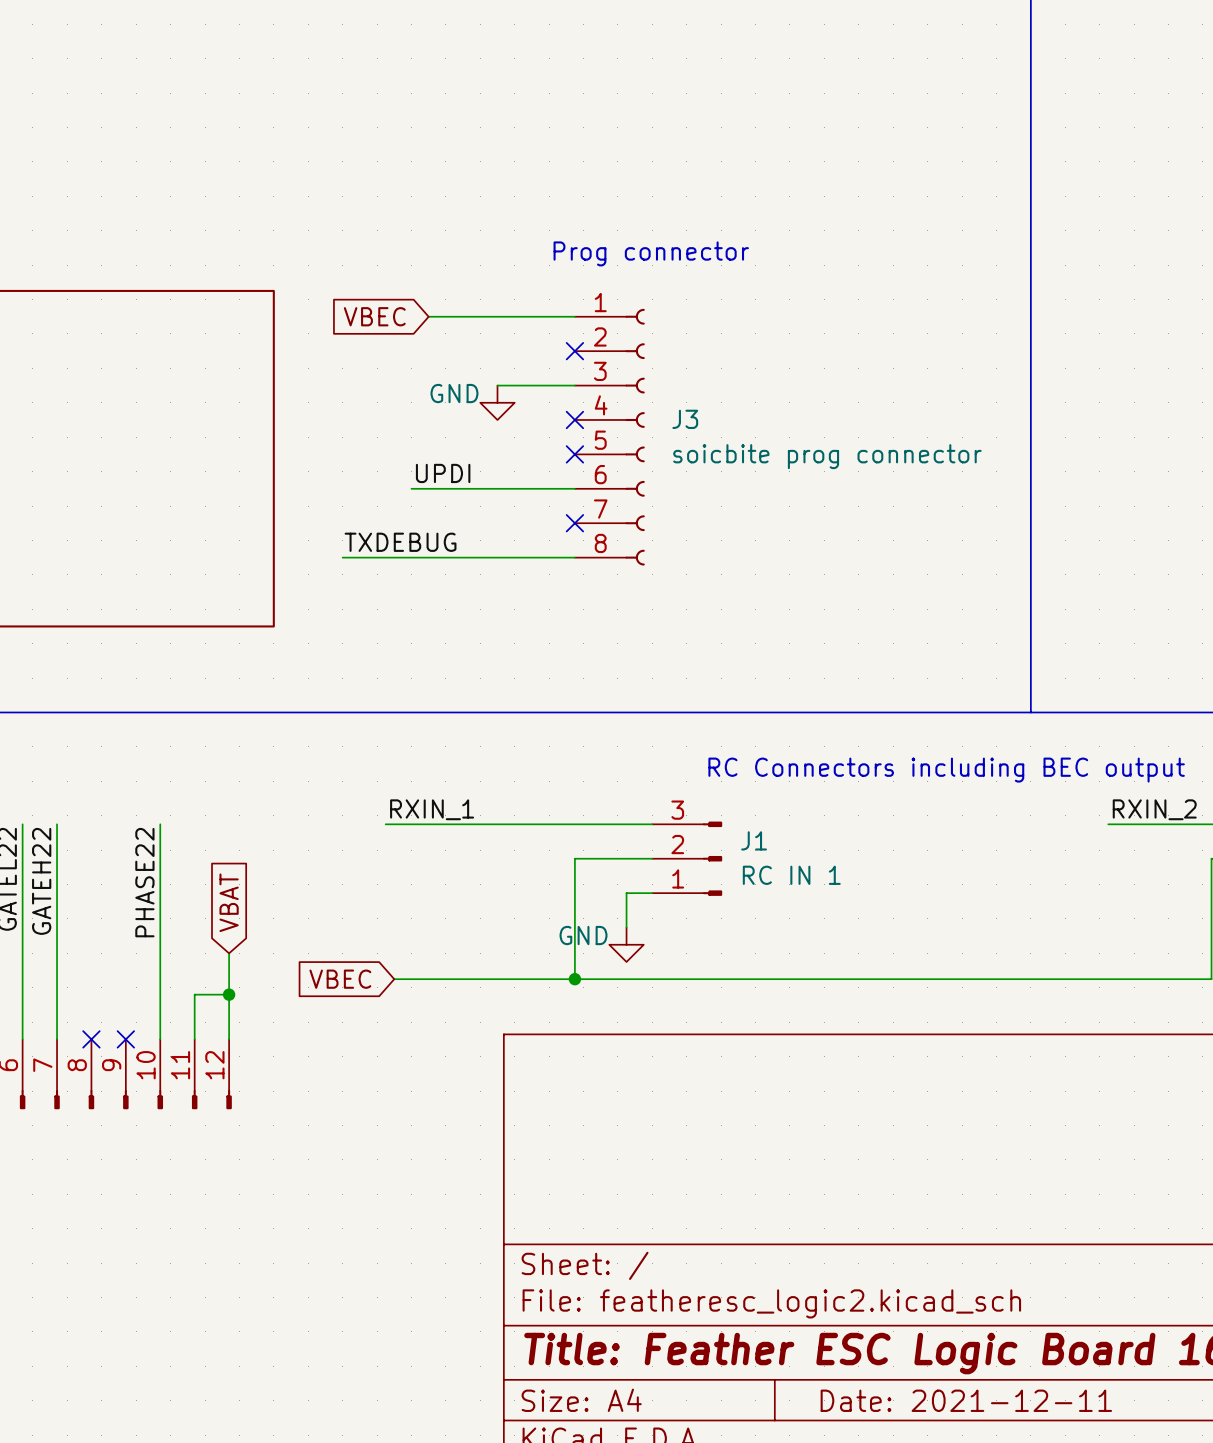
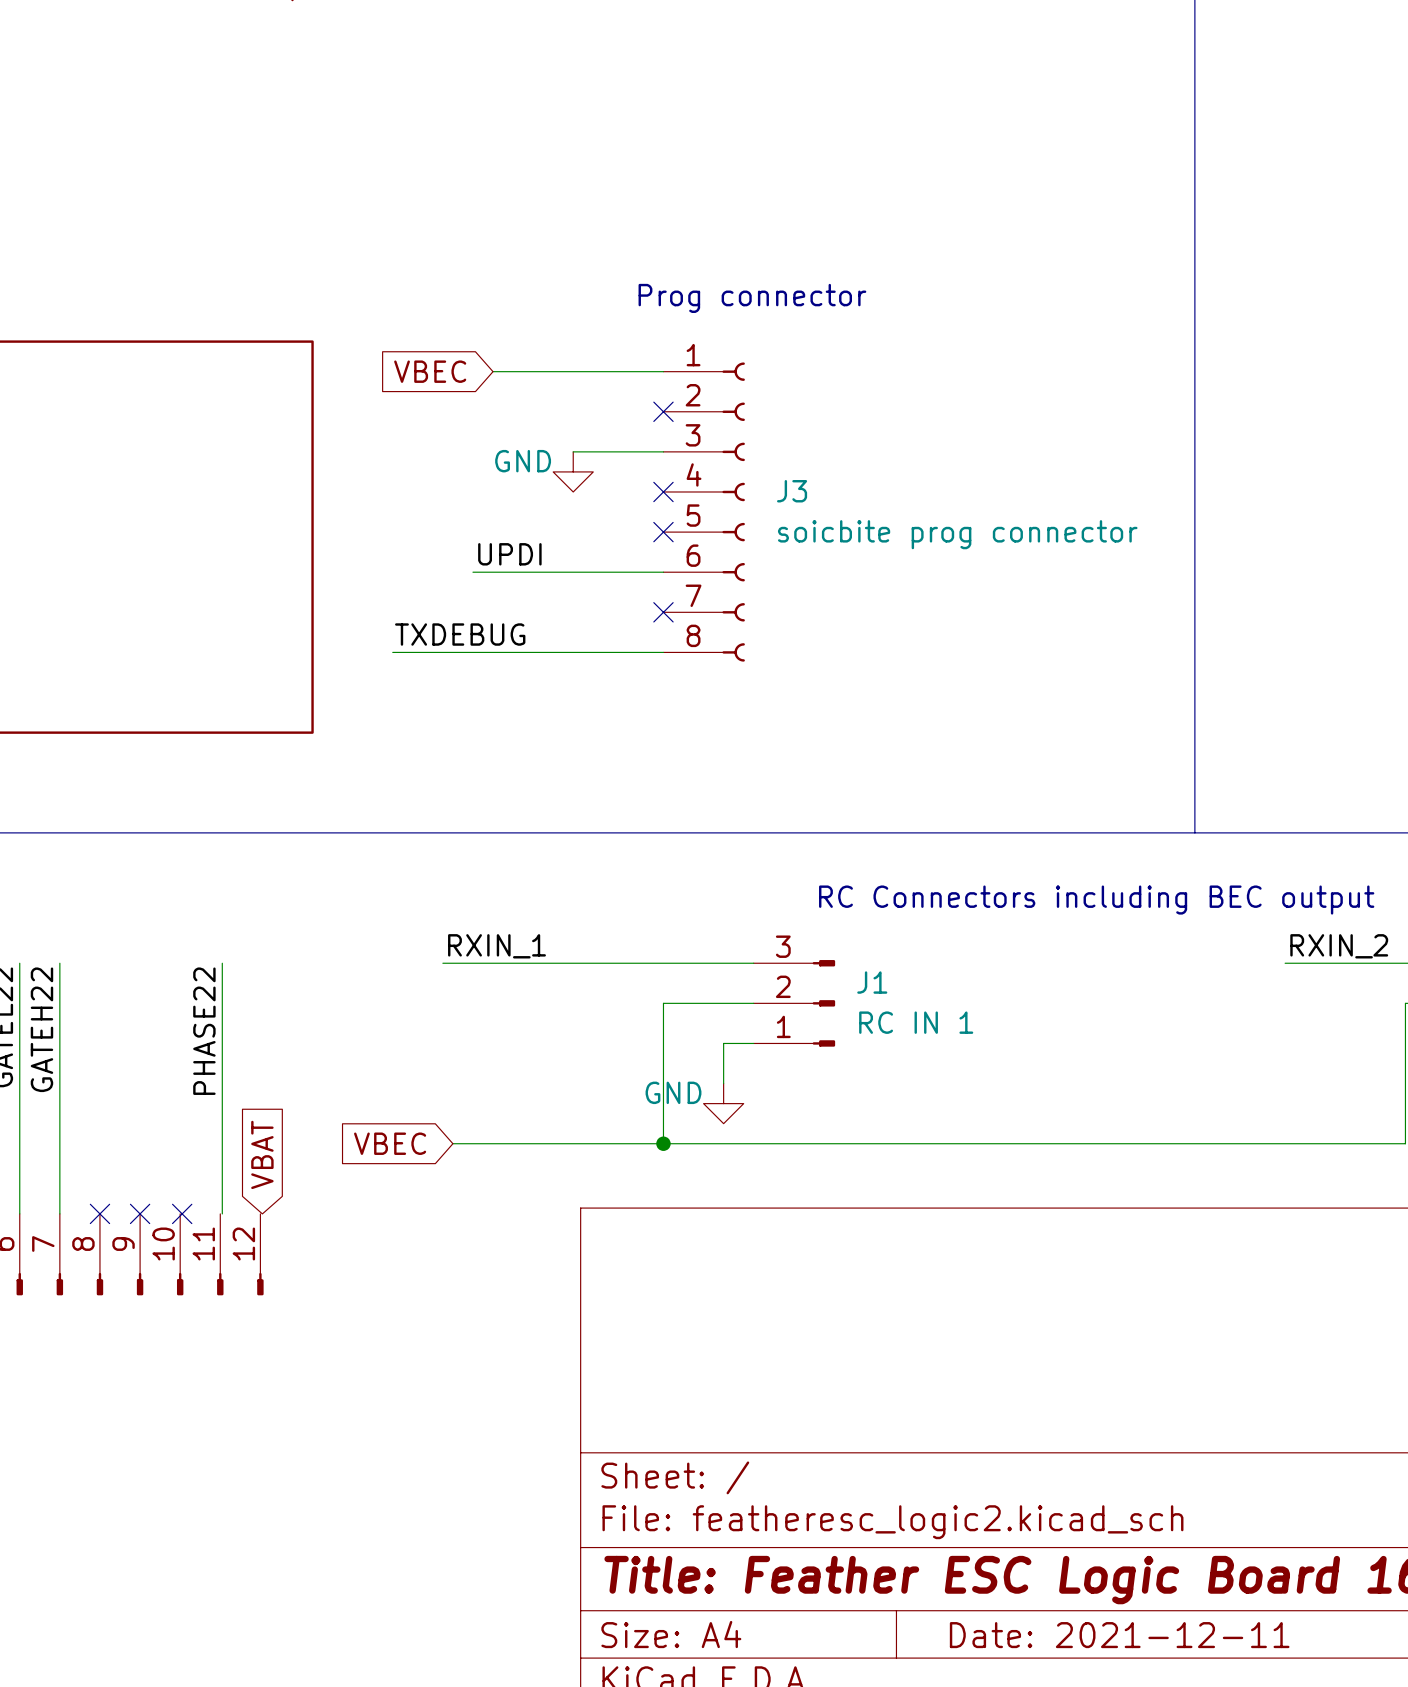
wire: (160, 824) (160, 1039) -> (222, 963) (222, 1213)
label position: PHASE22 (144, 882) -> PHASE22 (204, 1031)
global label position: VBAT (229, 902) -> VBAT (262, 1154)
wire: (229, 953) (229, 1039) -> none
wire: (229, 994) (194, 994) (194, 1039) -> none
junction: (229, 994) -> none
no-connect mark: none -> (182, 1213)

